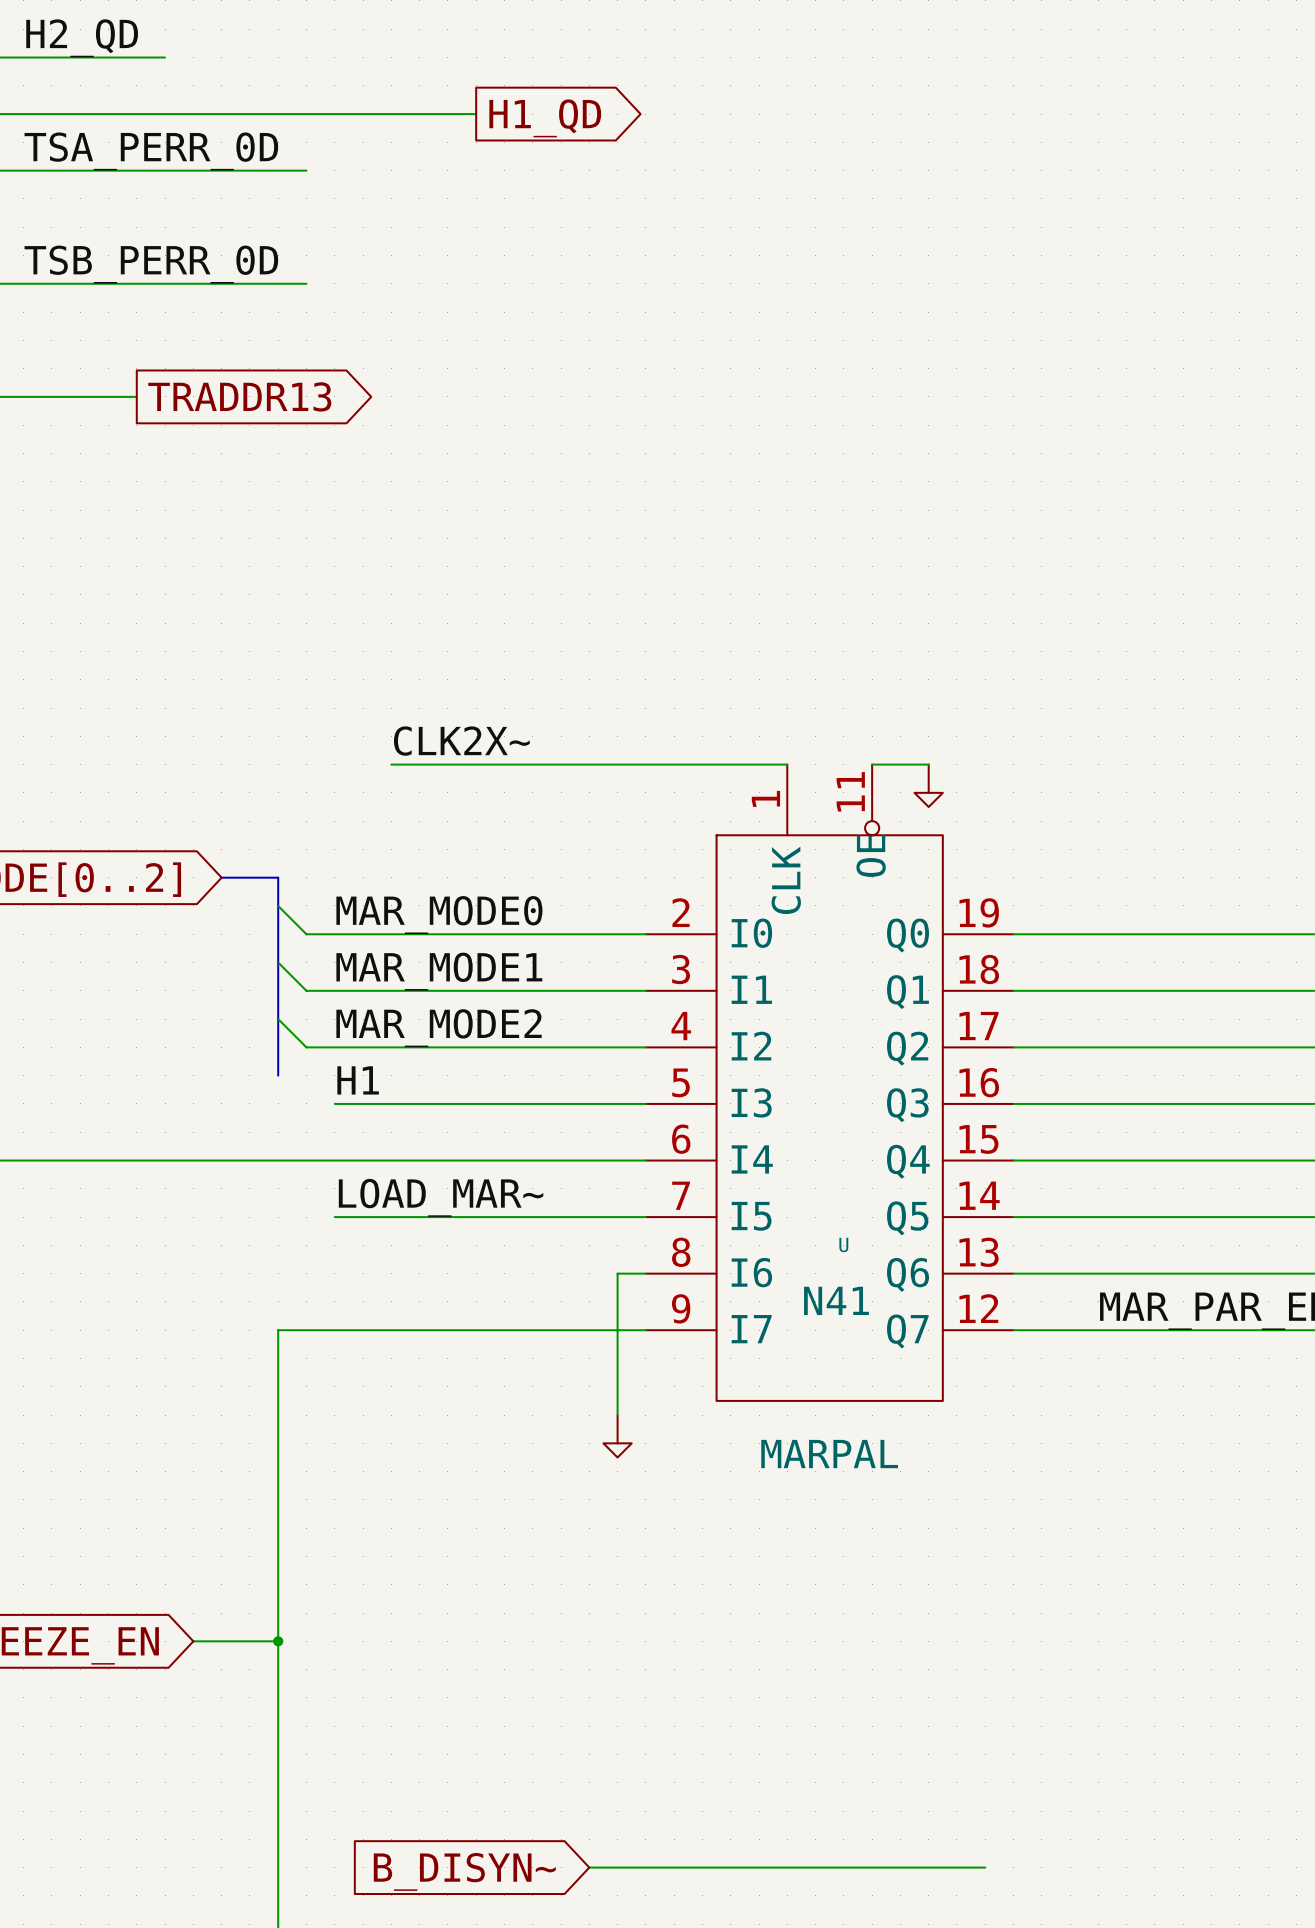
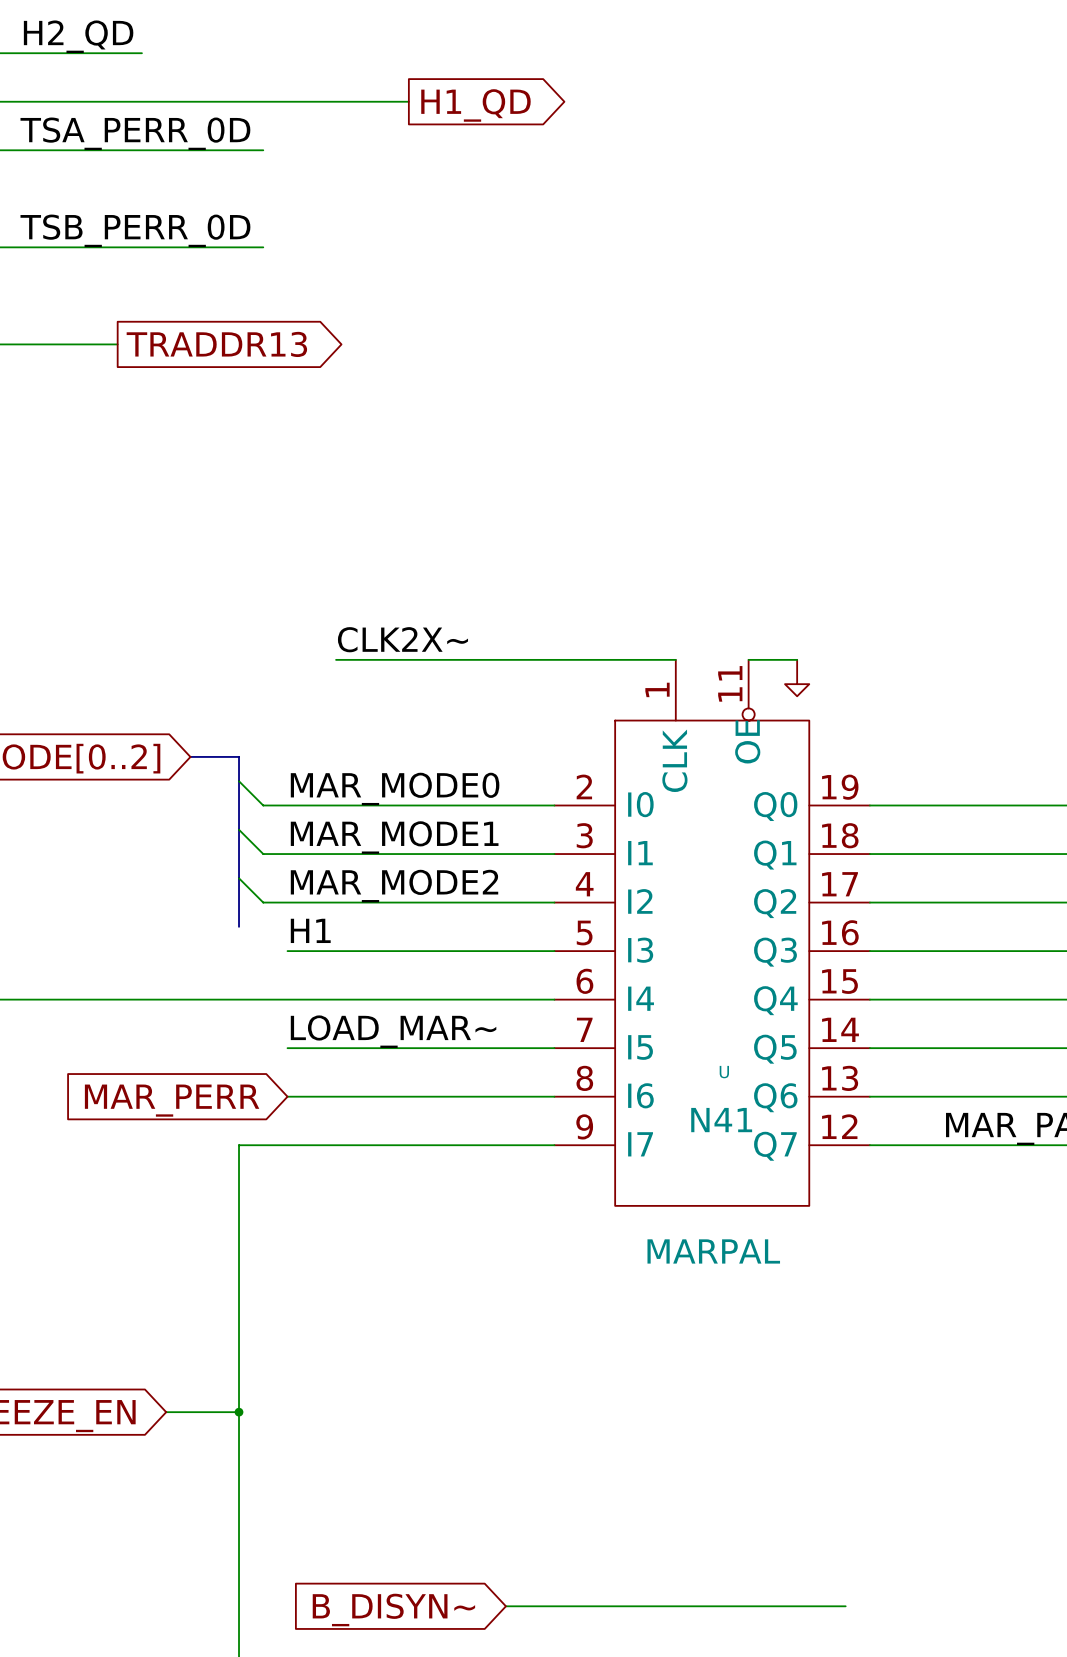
wire: (617, 1273) (617, 1415) -> (530, 1096) (287, 1096)
global label: none -> MAR_PERR (172, 1100)
power symbol: (617, 1436) -> none

